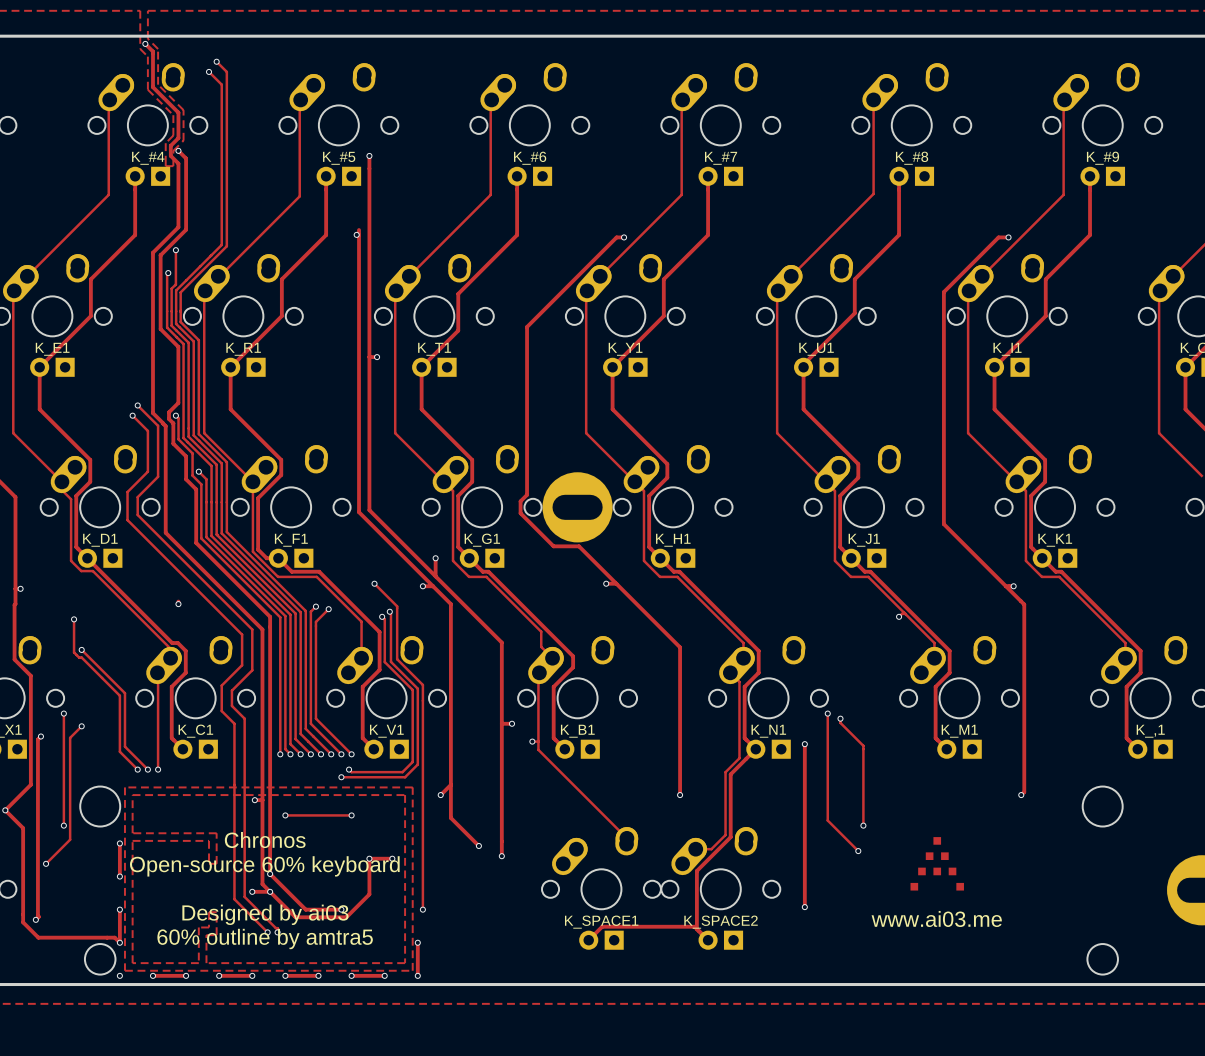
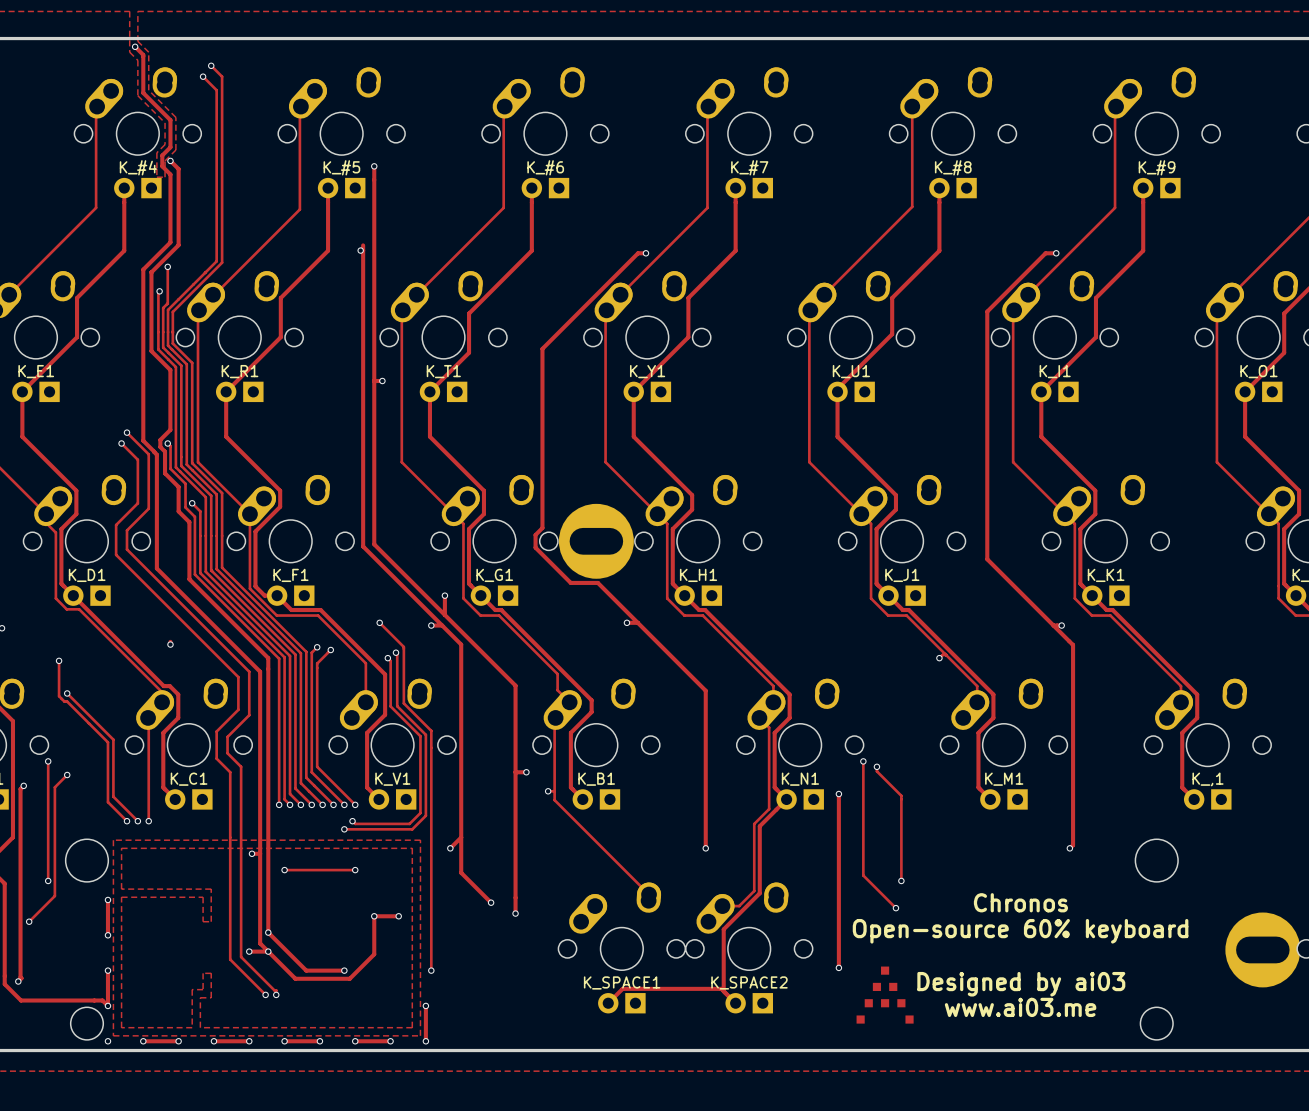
text: Chronos (265, 840) -> none
text: none -> Chronos (1020, 902)
part position: (937, 863) -> (885, 995)
text: Open-source 60% keyboard (264, 866) -> none
text: none -> Open-source 60% keyboard (1020, 931)
text: Designed by ai03 (265, 914) -> none
text position: www.ai03.me (936, 918) -> www.ai03.me (1020, 1007)
text: none -> Designed by ai03 (1021, 984)
text: 60% outline by amtra5 (265, 939) -> none

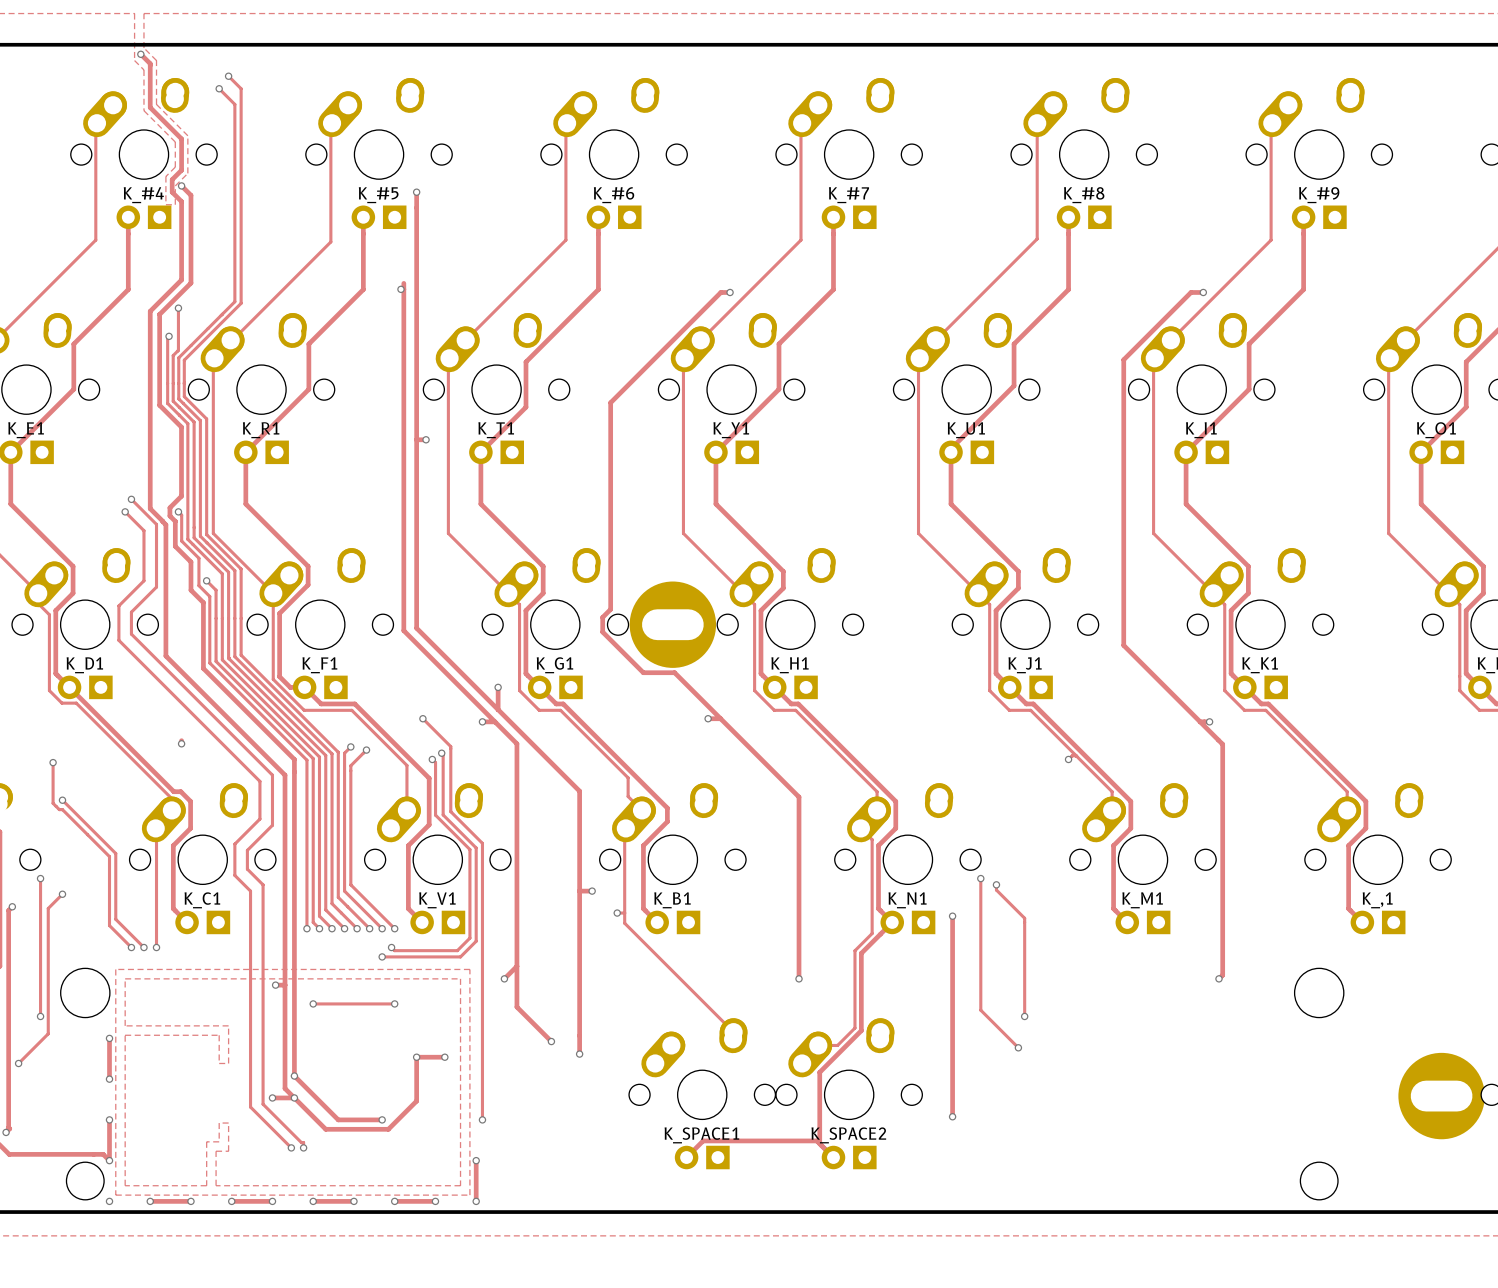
text: Chronos (1020, 902) -> none
text: Open-source 60% keyboard (1020, 931) -> none
text: Designed by ai03 (1021, 984) -> none
part: (885, 995) -> none
text: www.ai03.me (1020, 1007) -> none

